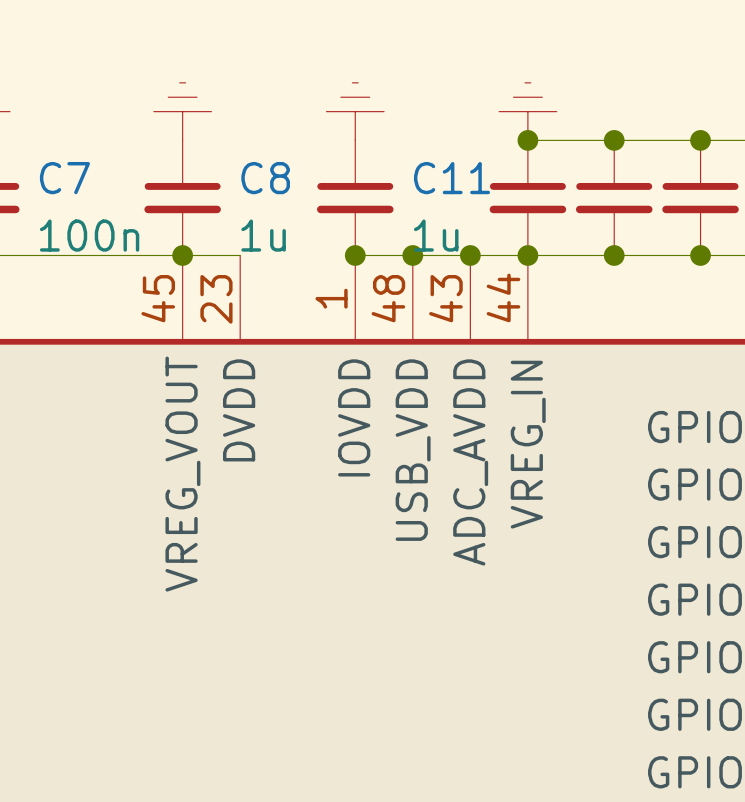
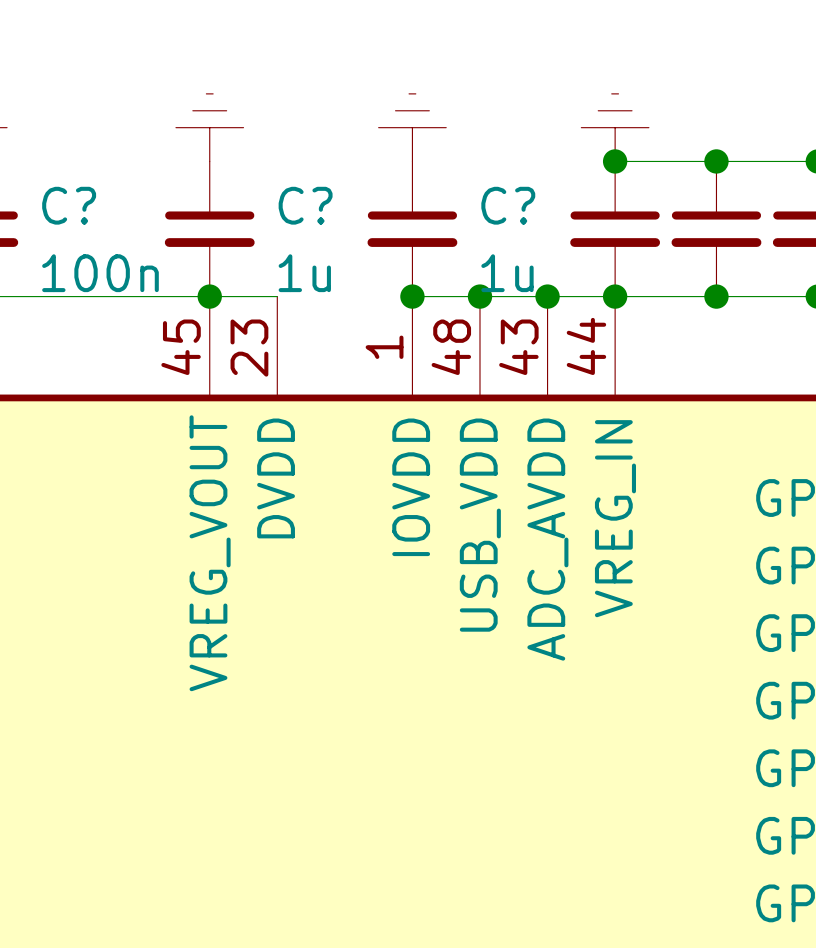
C7 name: C7 (64, 178) -> C? (69, 205)
C8 name: C8 (265, 178) -> C? (305, 205)
C11 name: C11 (451, 178) -> C? (508, 205)

